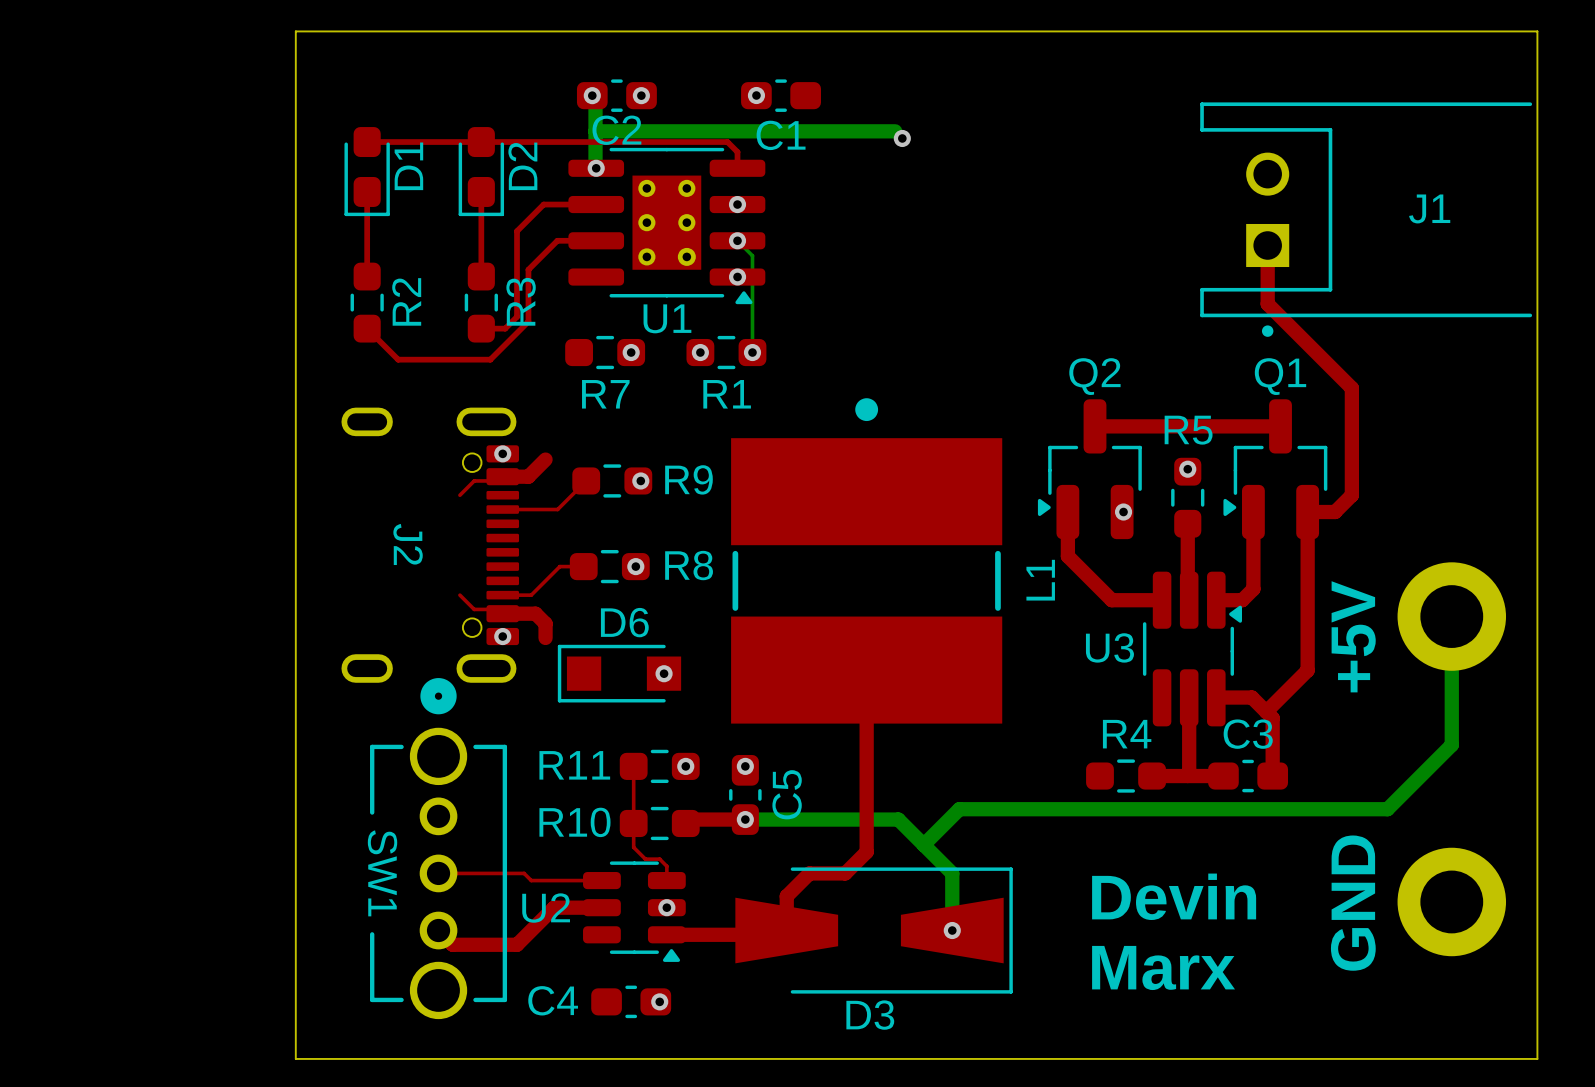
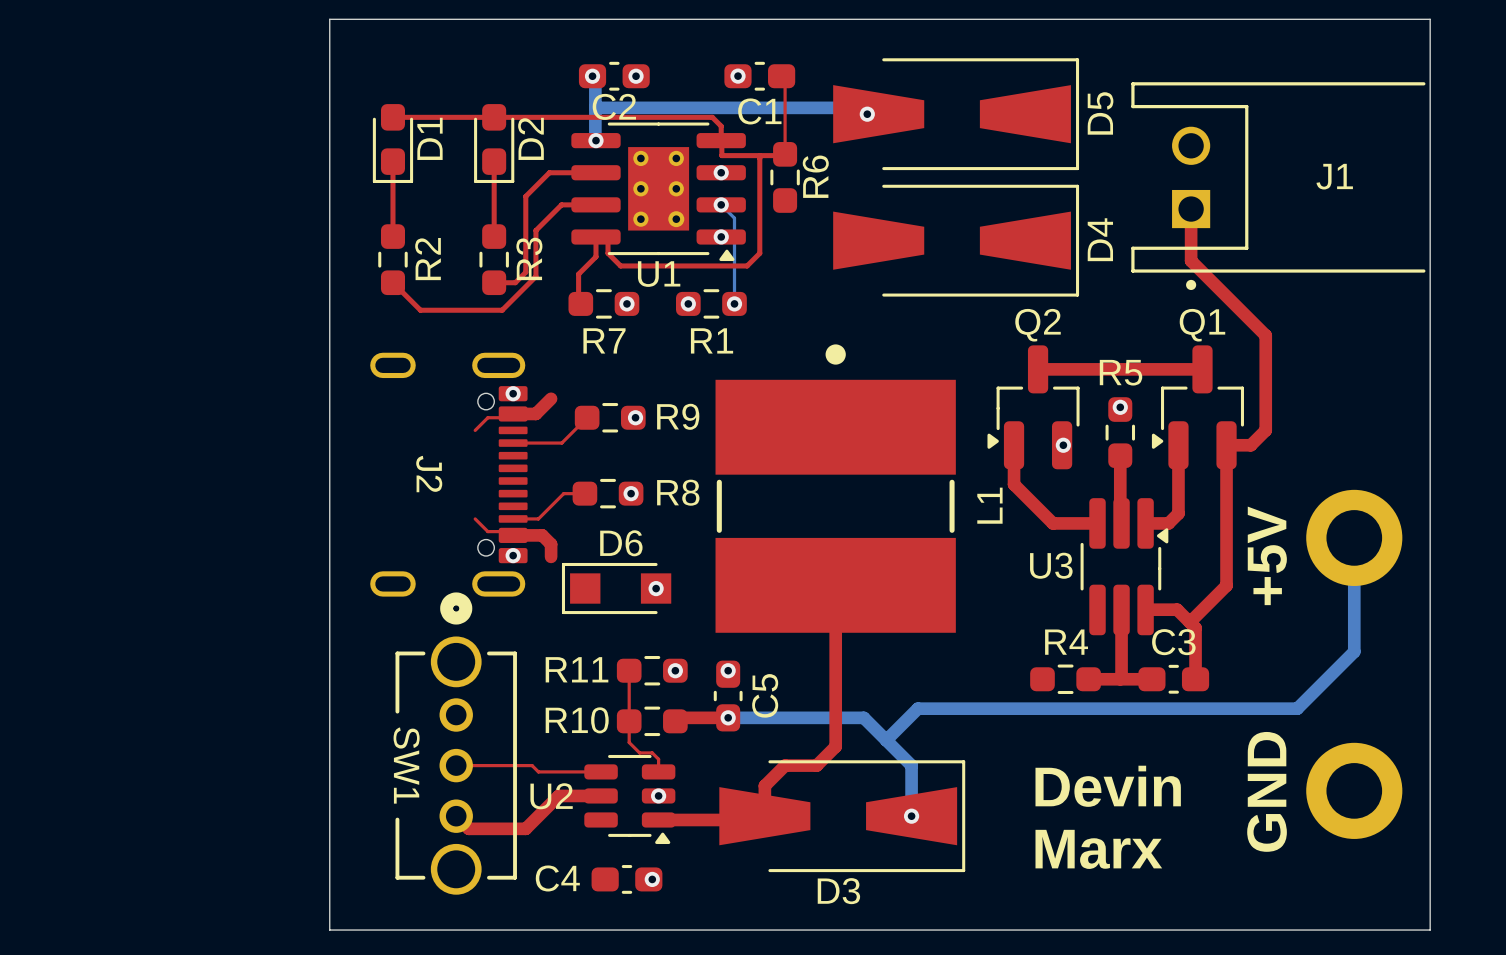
top track: none -> (785, 79) (785, 154)
D5: none -> (956, 114)
top track: none -> (721, 141) (721, 155) (785, 155)
top track: none -> (759, 155) (759, 253) (747, 265) (620, 265) (608, 253) (608, 240)
R6: none -> (785, 177)
top track: none -> (595, 237) (595, 256) (578, 274) (578, 303)
D4: none -> (956, 240)

